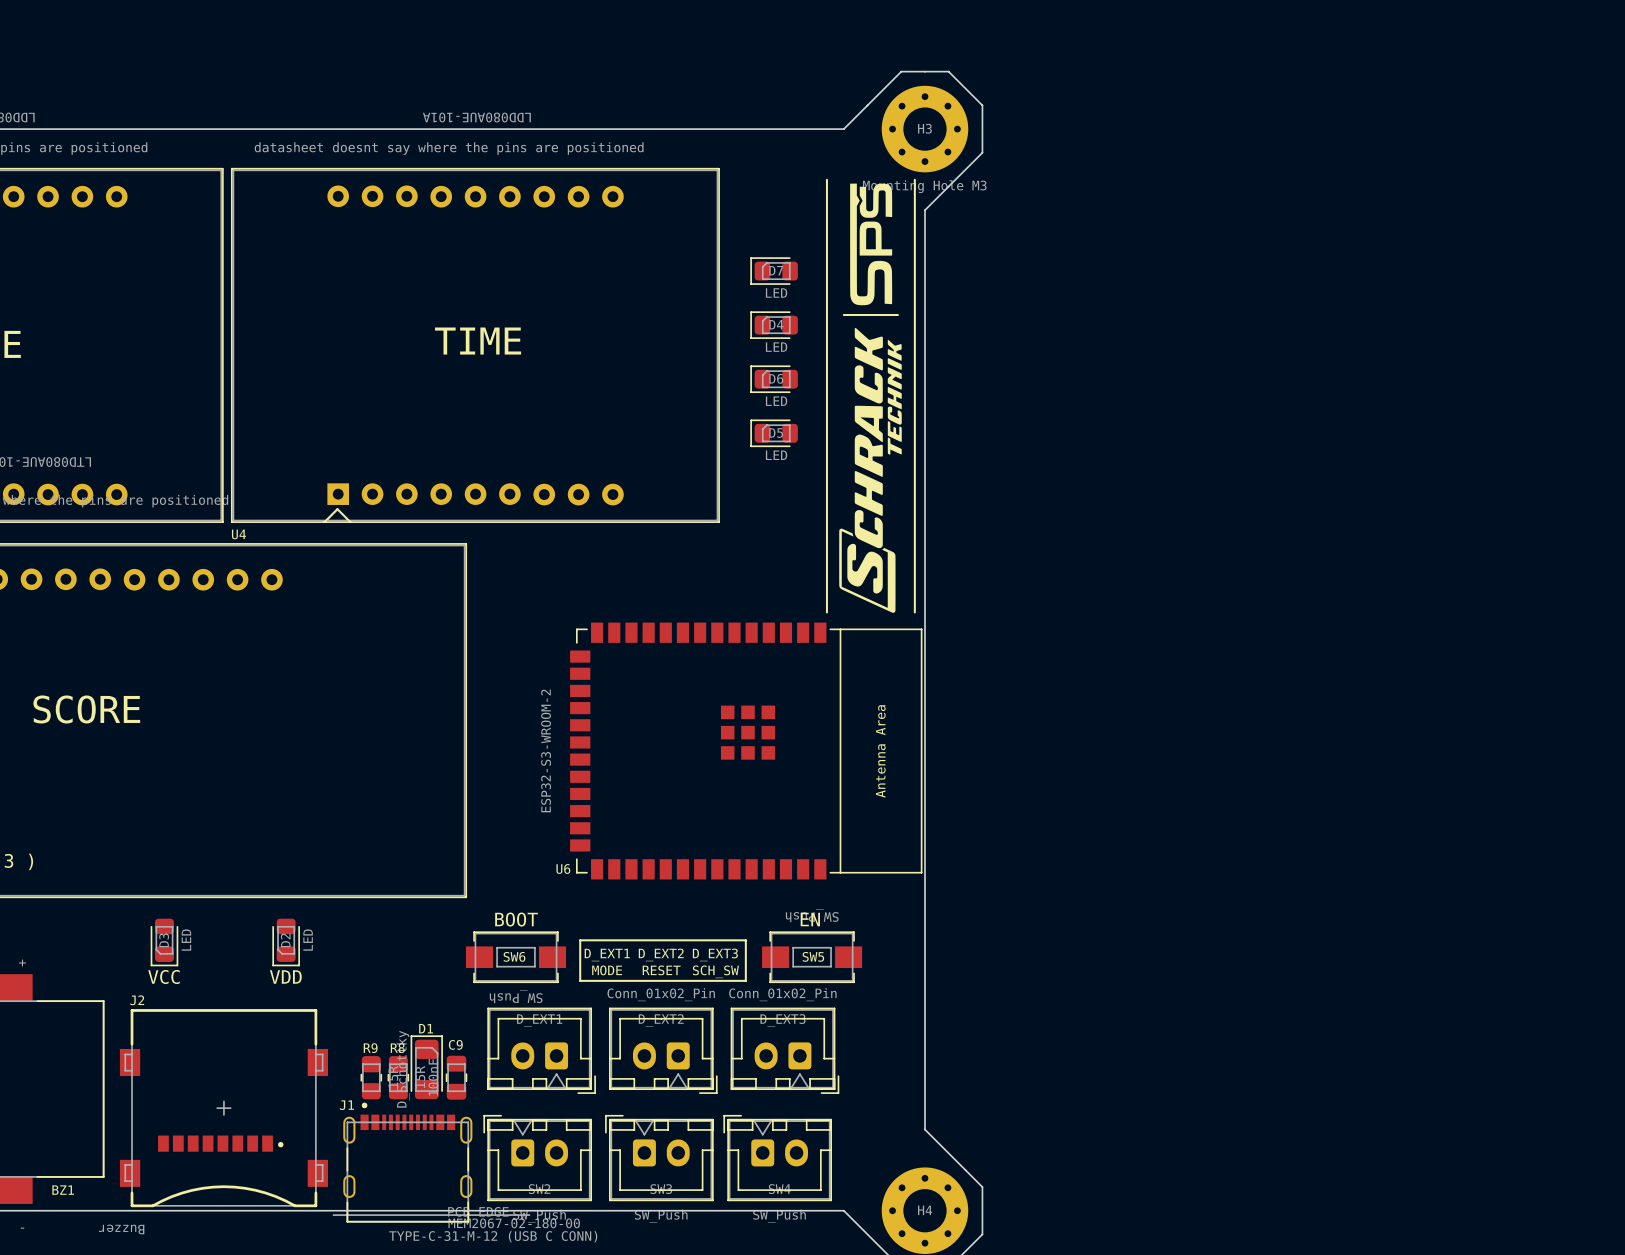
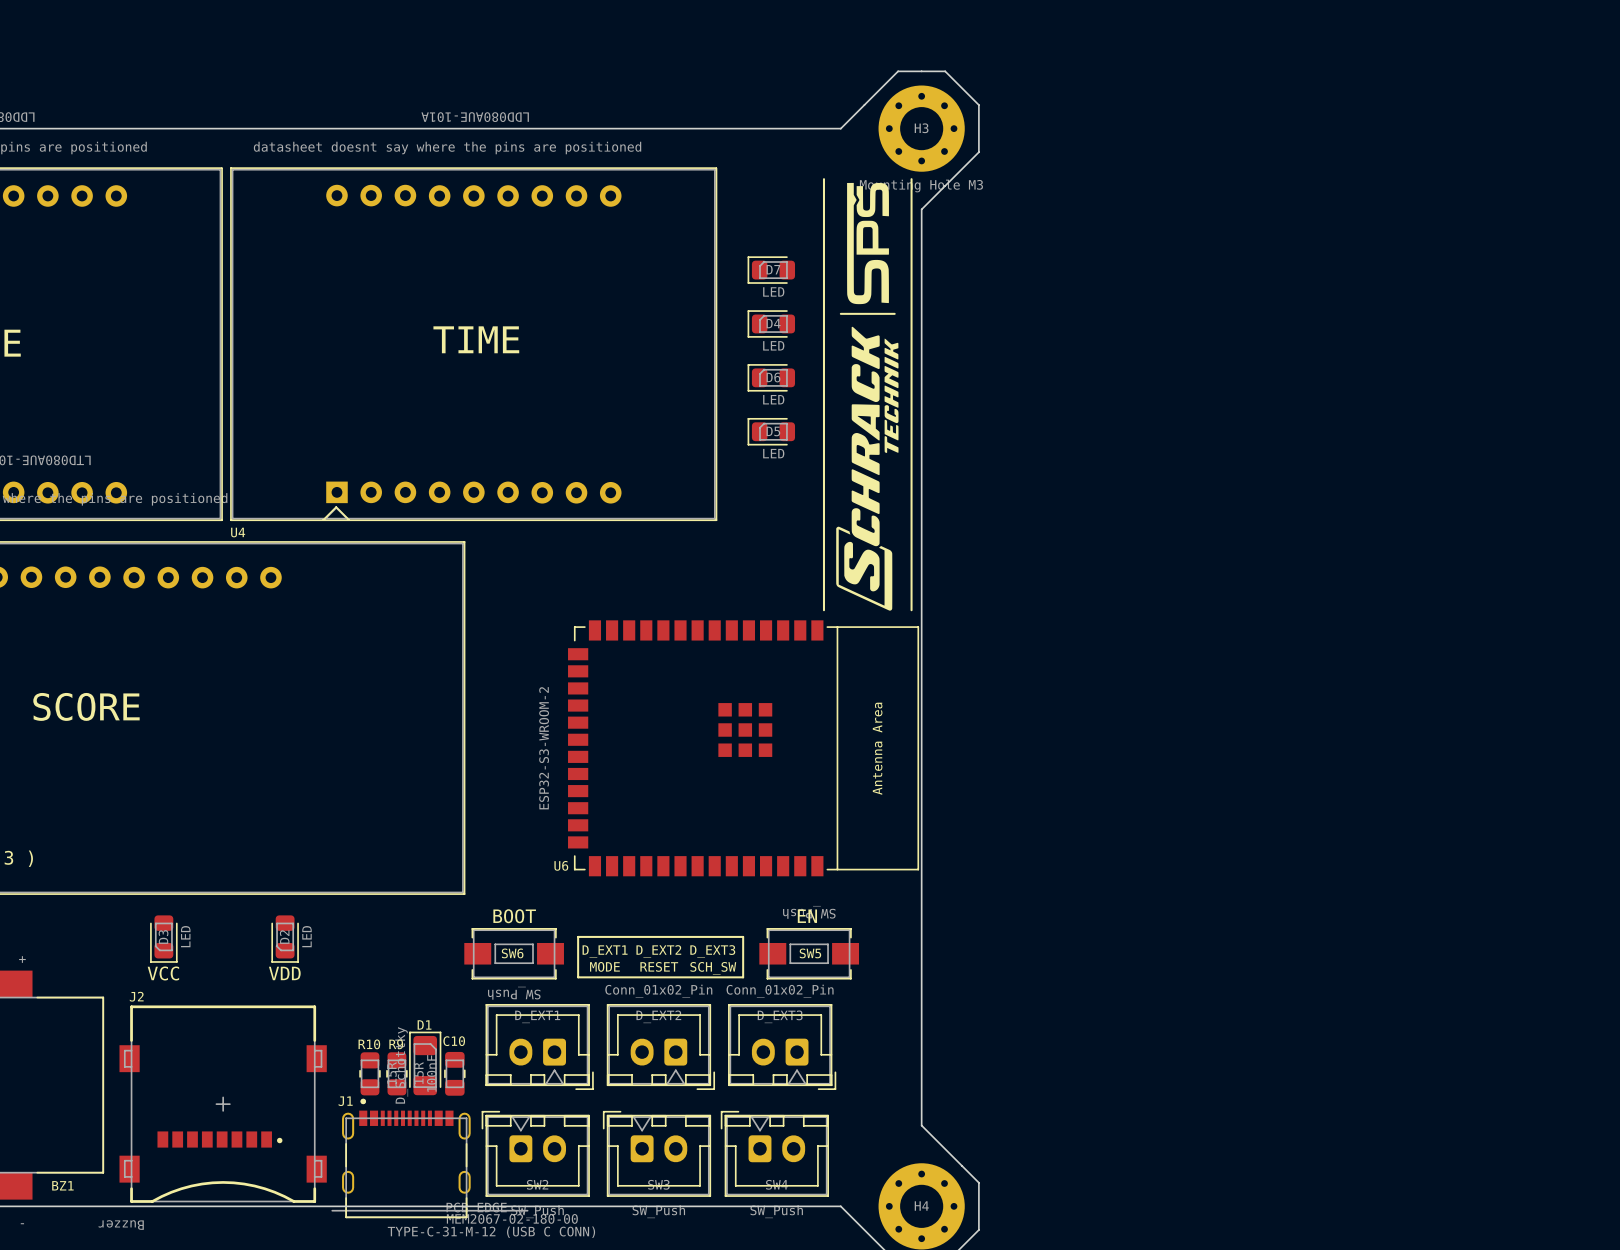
C9 name: C9 (455, 1044) -> C10 (454, 1041)
R9 name: R9 (370, 1048) -> R10 (369, 1044)
R8 name: R8 (397, 1048) -> R9 (396, 1044)

